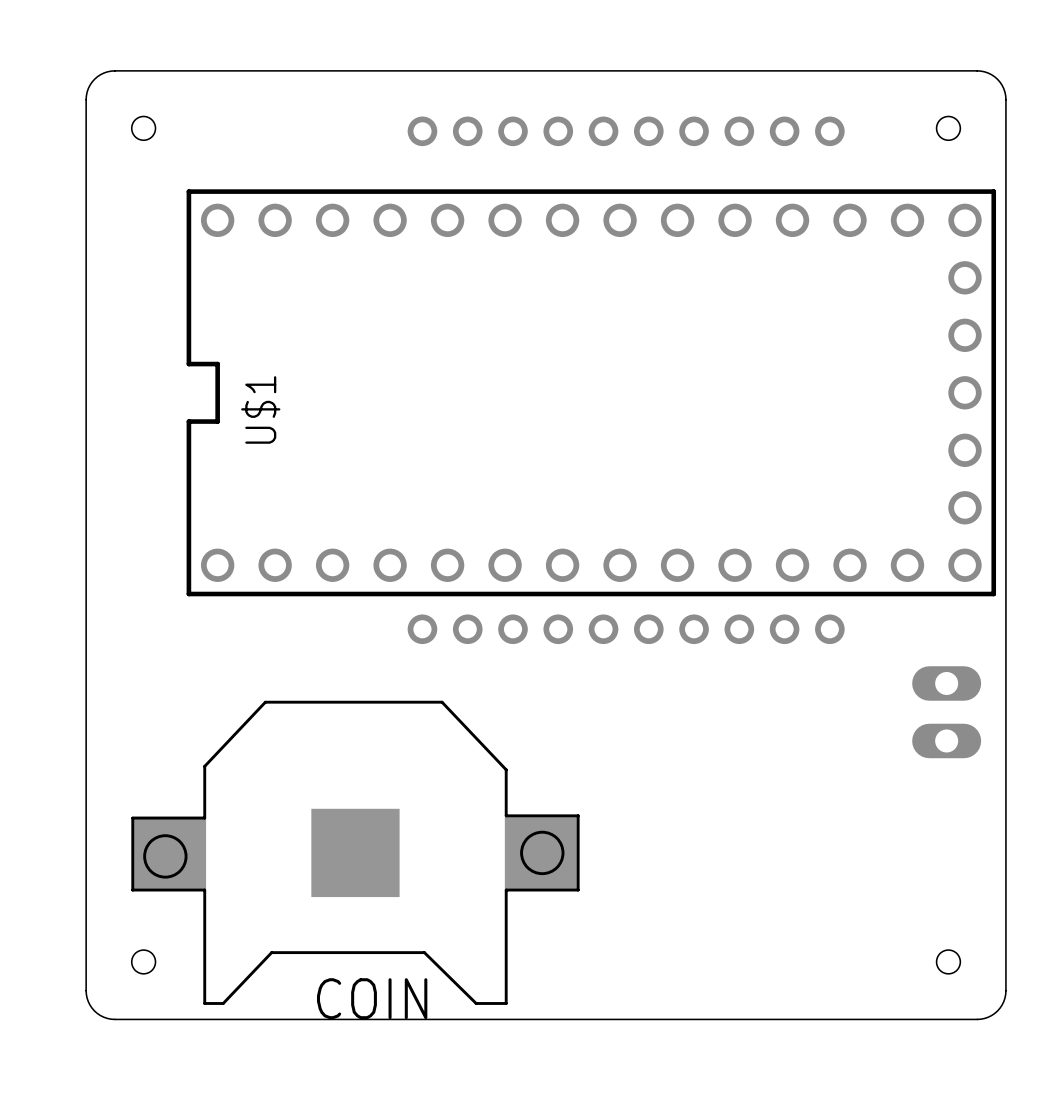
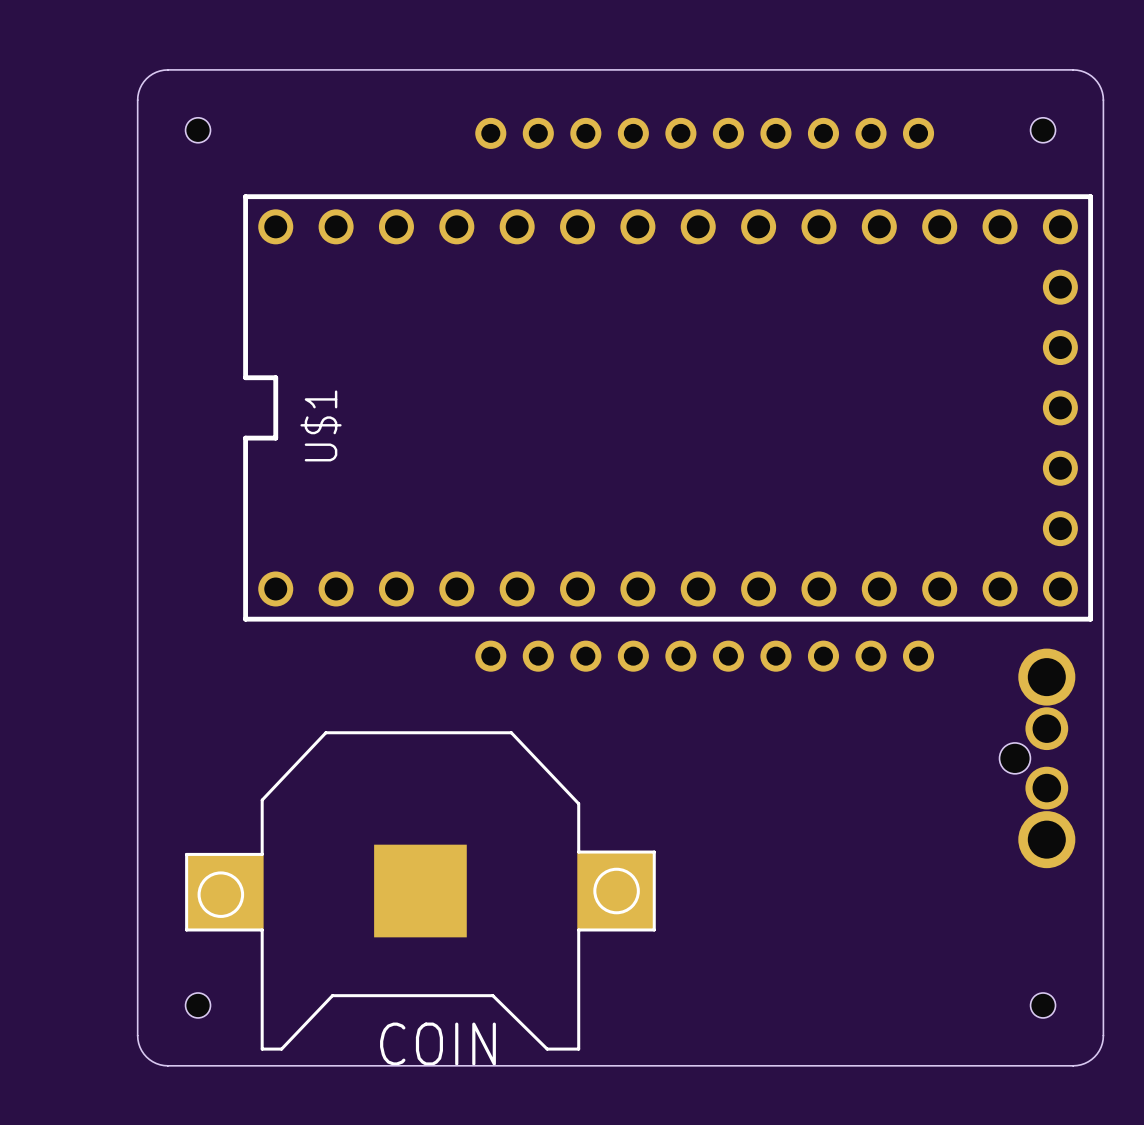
part footprint: [912, 666, 982, 759] -> [999, 648, 1076, 869]

